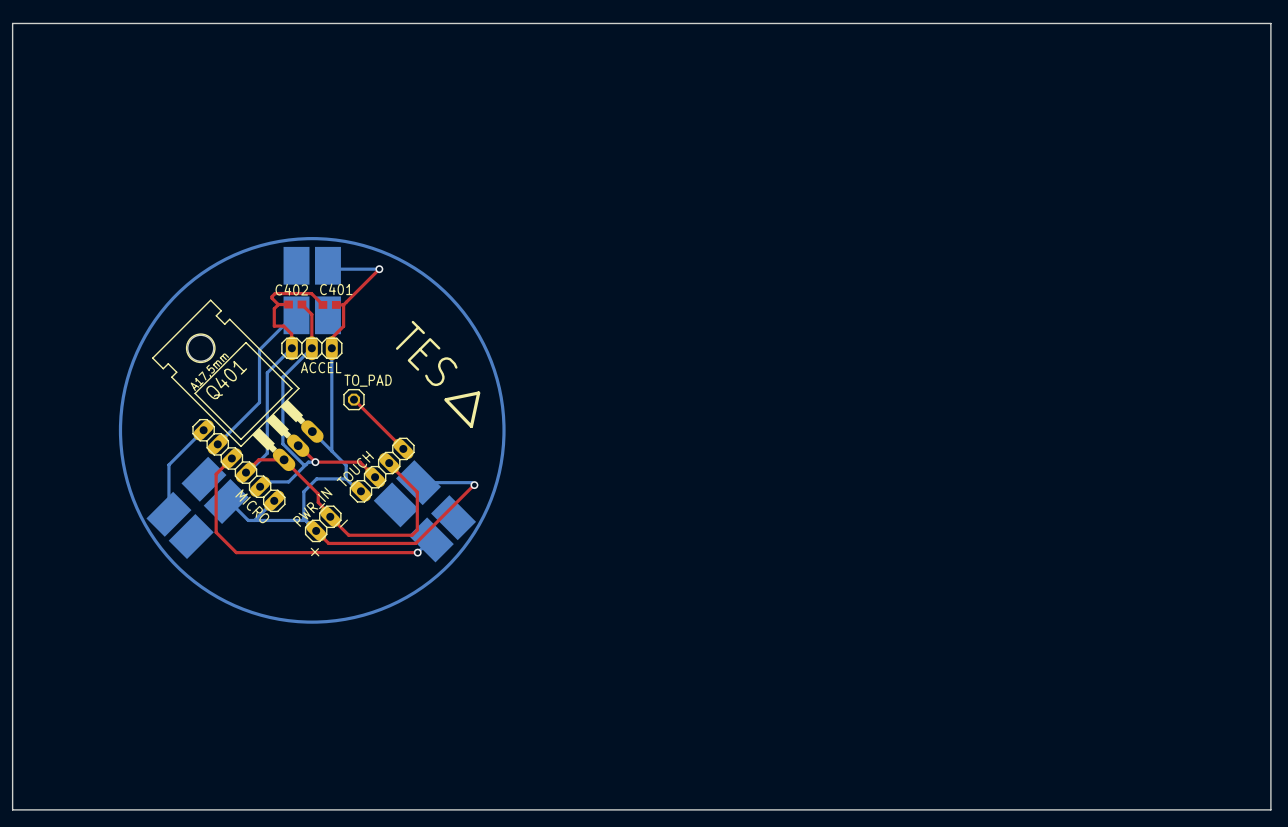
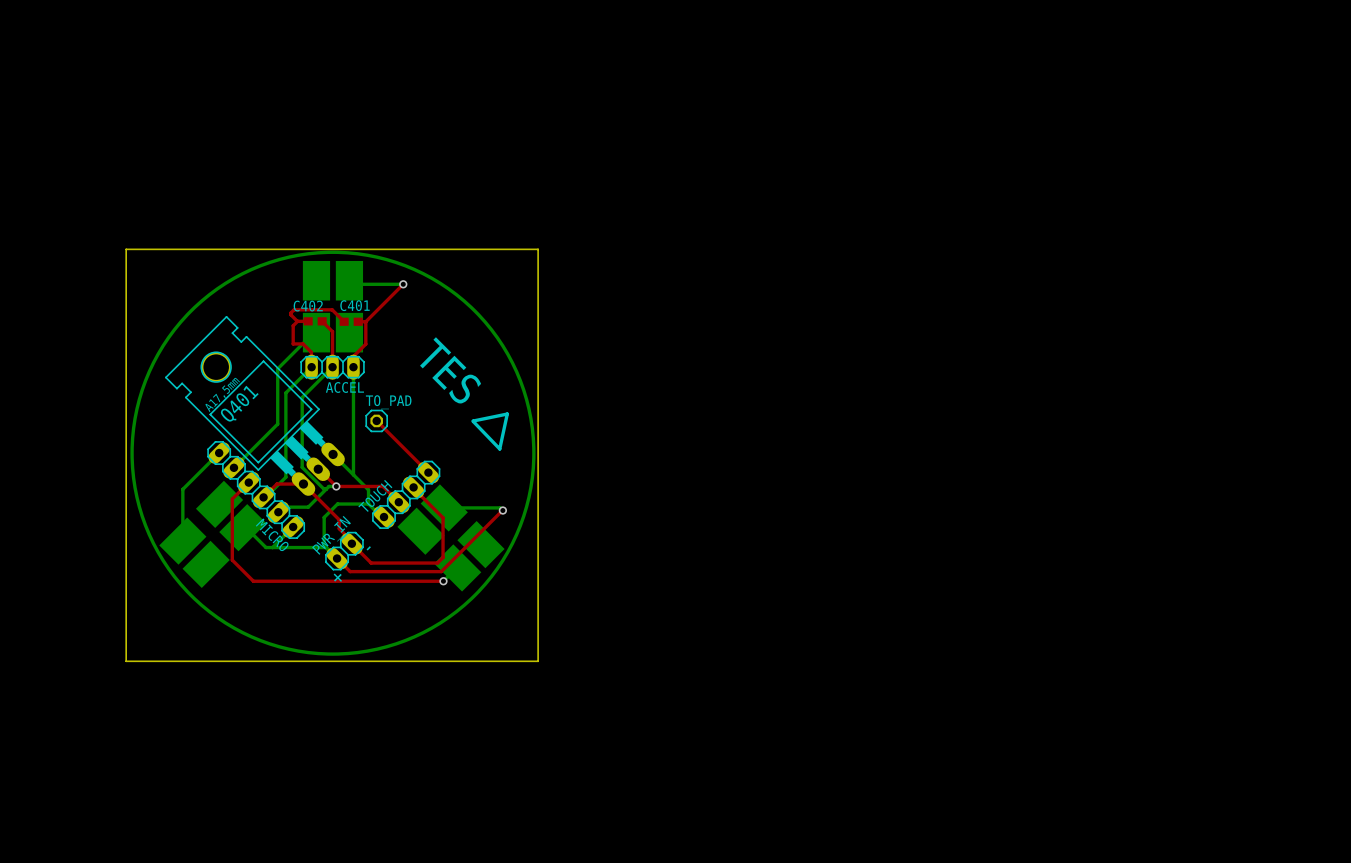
board edge: (12, 23) (1270, 23) (1270, 809) (12, 809) (12, 23) -> none
board edge: none -> (126, 249) (538, 249) (538, 661) (126, 661) (126, 249)

